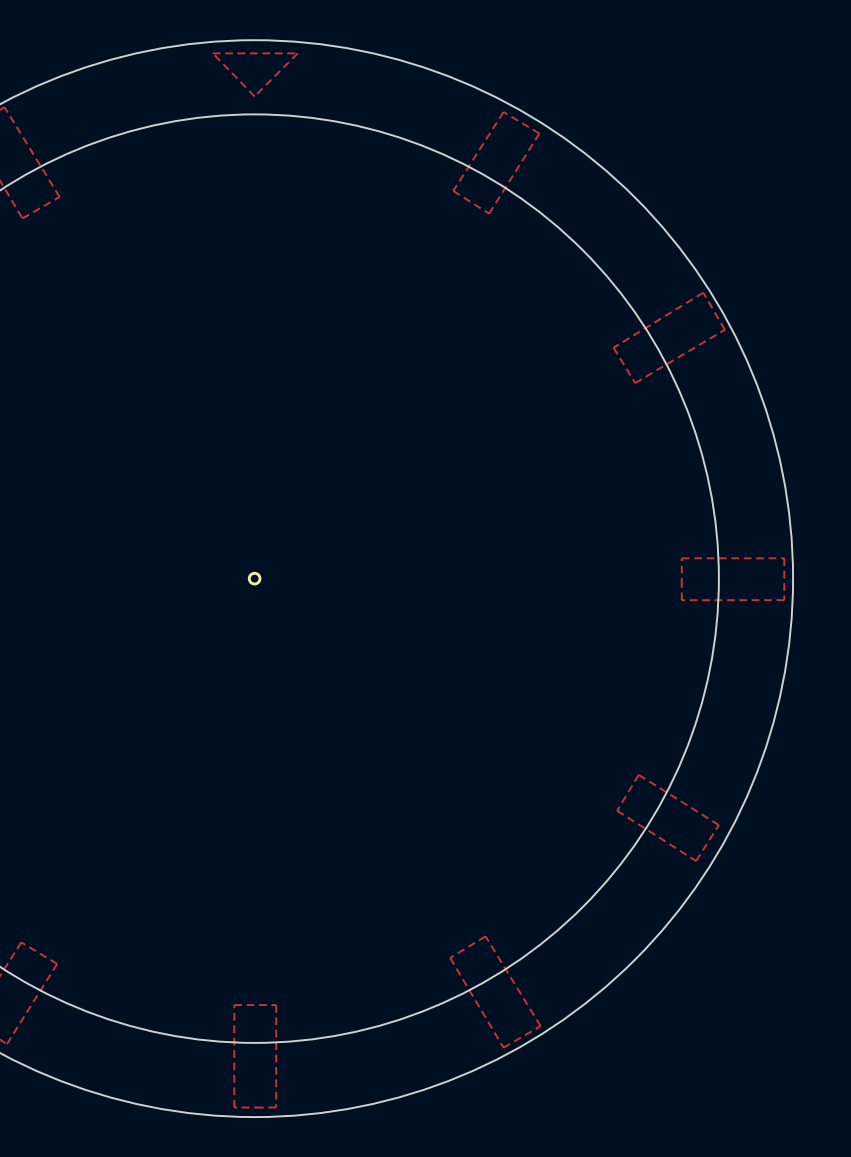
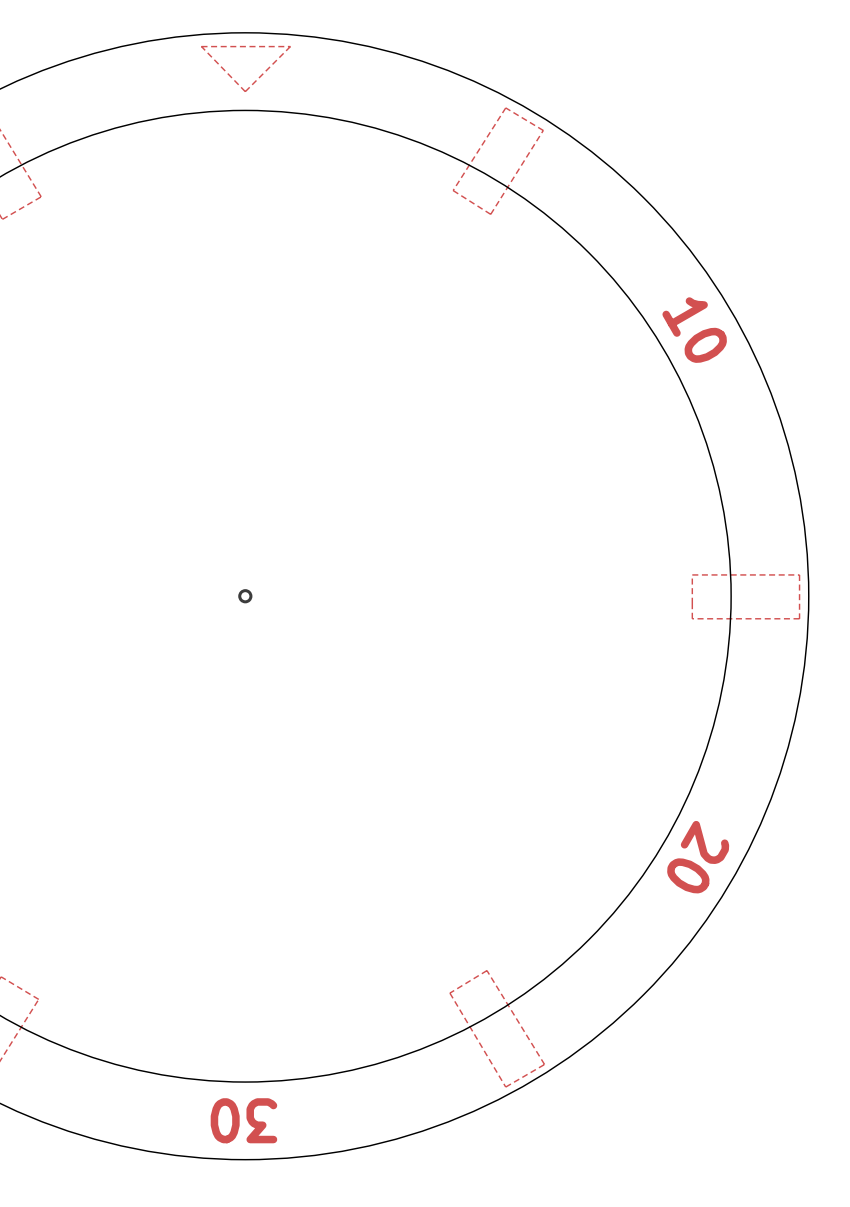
top zone outline: (703, 292) (724, 329) (635, 383) (613, 347) (703, 292) -> none
text: none -> 10 (694, 330)
top zone outline: (638, 774) (718, 825) (696, 861) (617, 810) (638, 774) -> none
text: none -> 20 (698, 857)
top zone outline: (234, 1005) (234, 1107) (276, 1107) (276, 1005) (234, 1005) -> none
text: none -> 30 (243, 1120)

